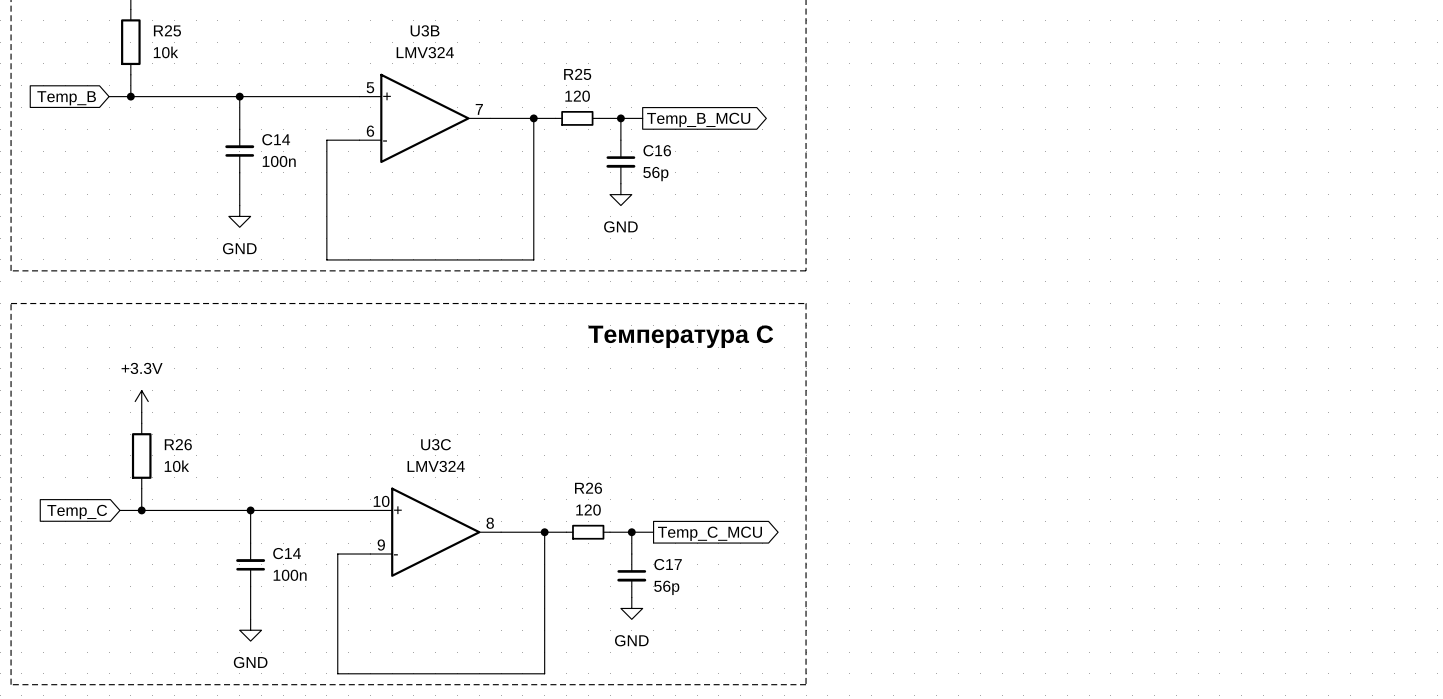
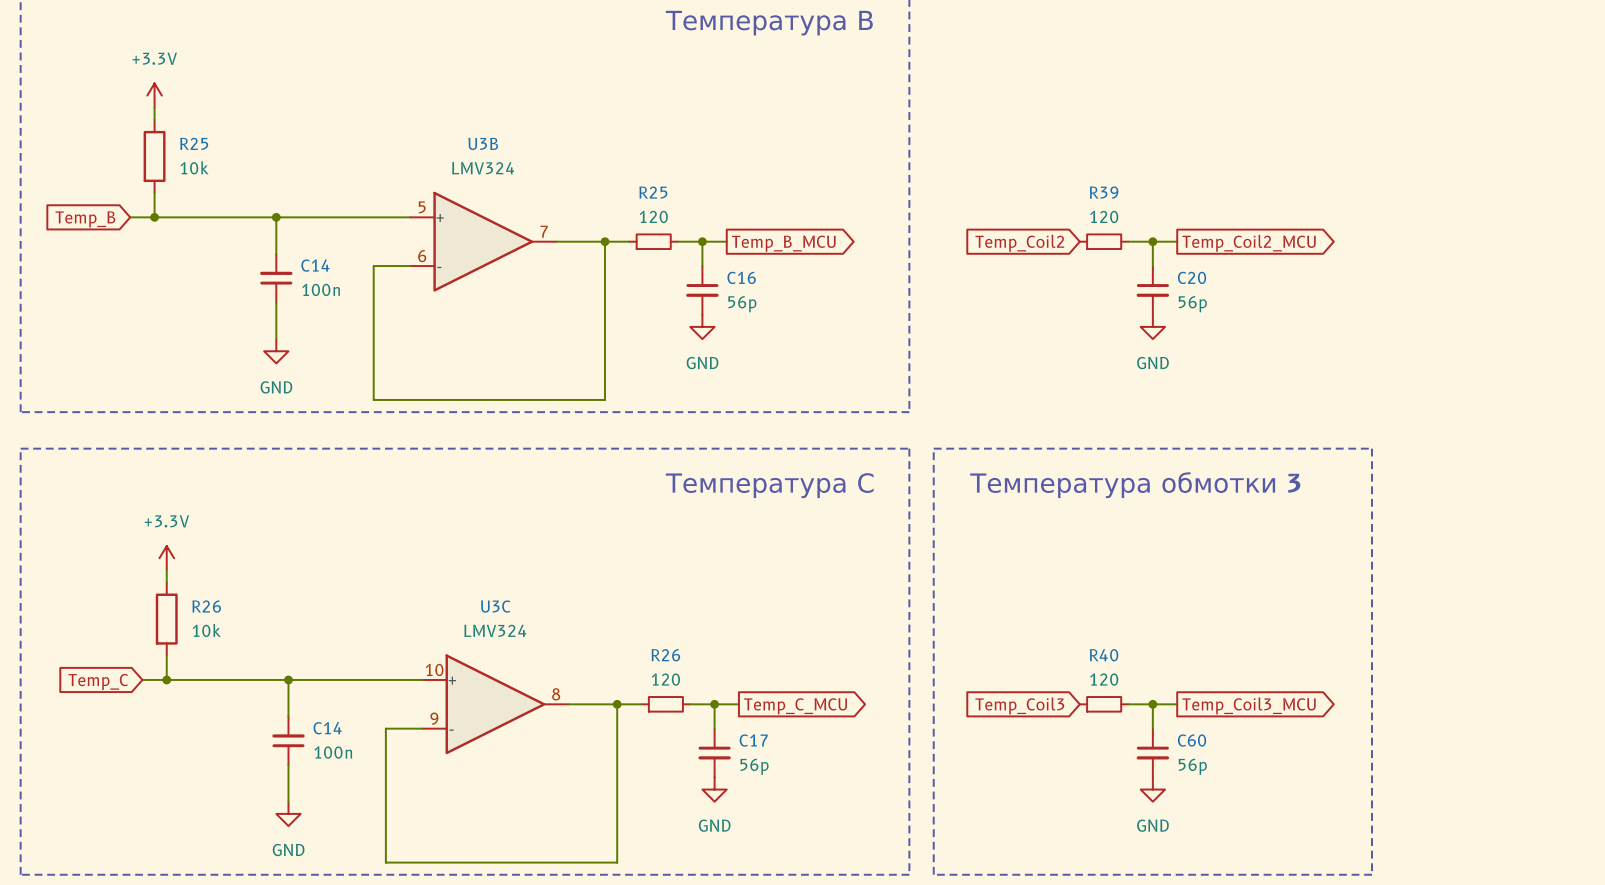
R39: none -> 120 (1104, 241)
wire: none -> (1128, 241) (1177, 241)
wire: none -> (1152, 241) (1152, 266)
junction: none -> (1152, 241)
global label: none -> Temp_Coil2 (1019, 243)
global label: none -> Temp_Coil2_MCU (1249, 243)
C20: none -> 56p (1152, 290)
power symbol: none -> GND (1152, 326)
line: none -> (933, 448) (1371, 448) (1371, 874) (933, 874) (933, 448)
text: none -> Температура обмотки 3 (1135, 485)
R40: none -> 120 (1104, 704)
wire: none -> (1128, 704) (1177, 704)
wire: none -> (1152, 704) (1152, 728)
junction: none -> (1152, 704)
global label: none -> Temp_Coil3 (1019, 705)
global label: none -> Temp_Coil3_MCU (1249, 705)
C60: none -> 56p (1152, 753)
power symbol: none -> GND (1152, 789)

